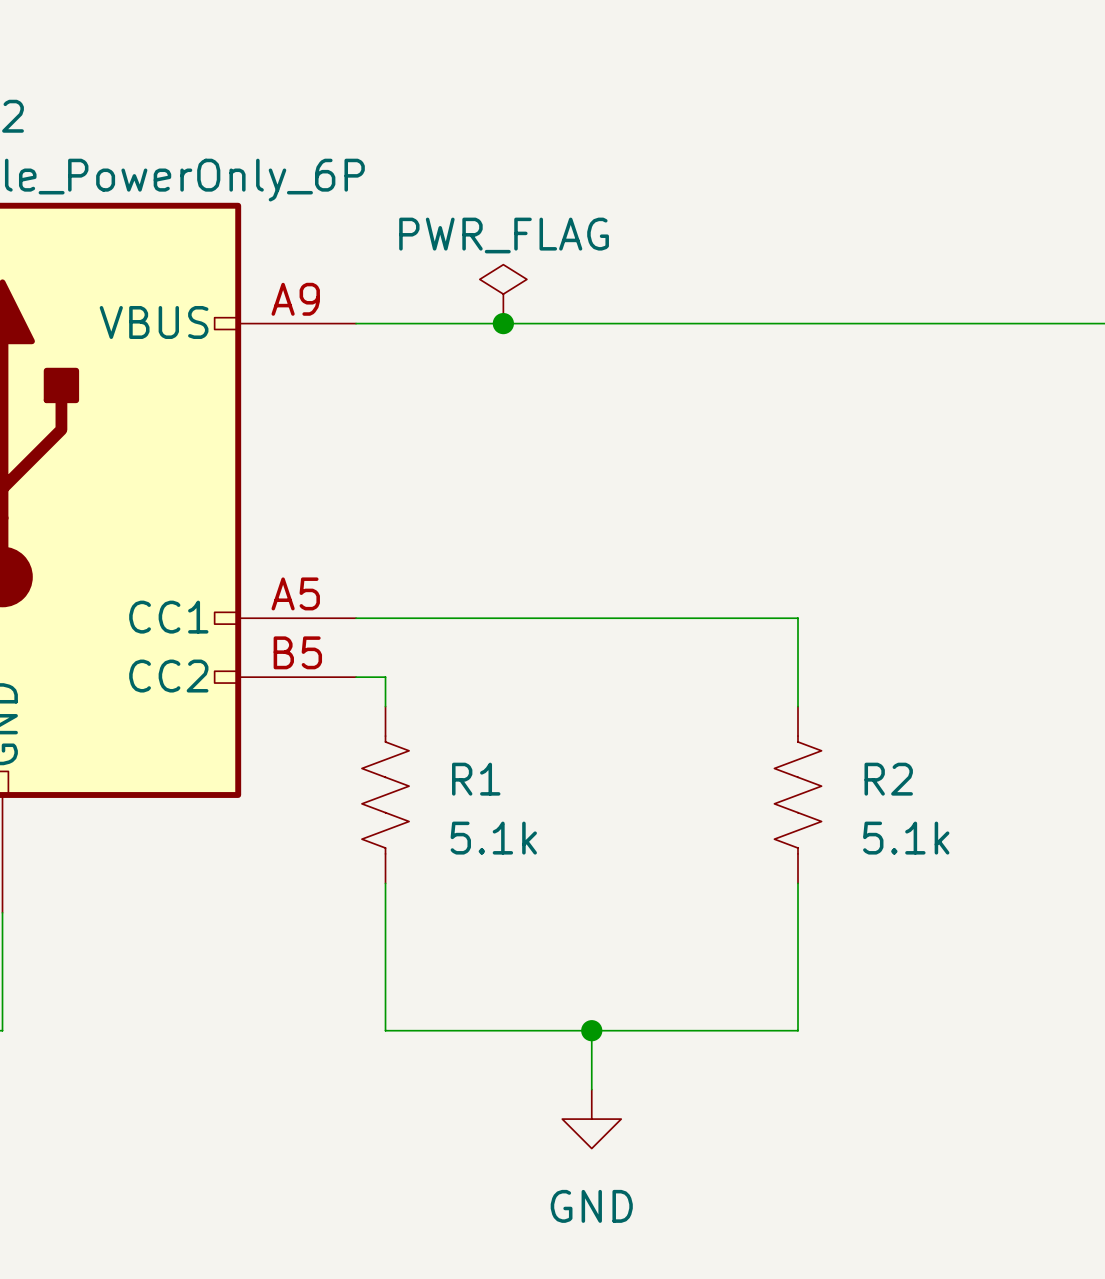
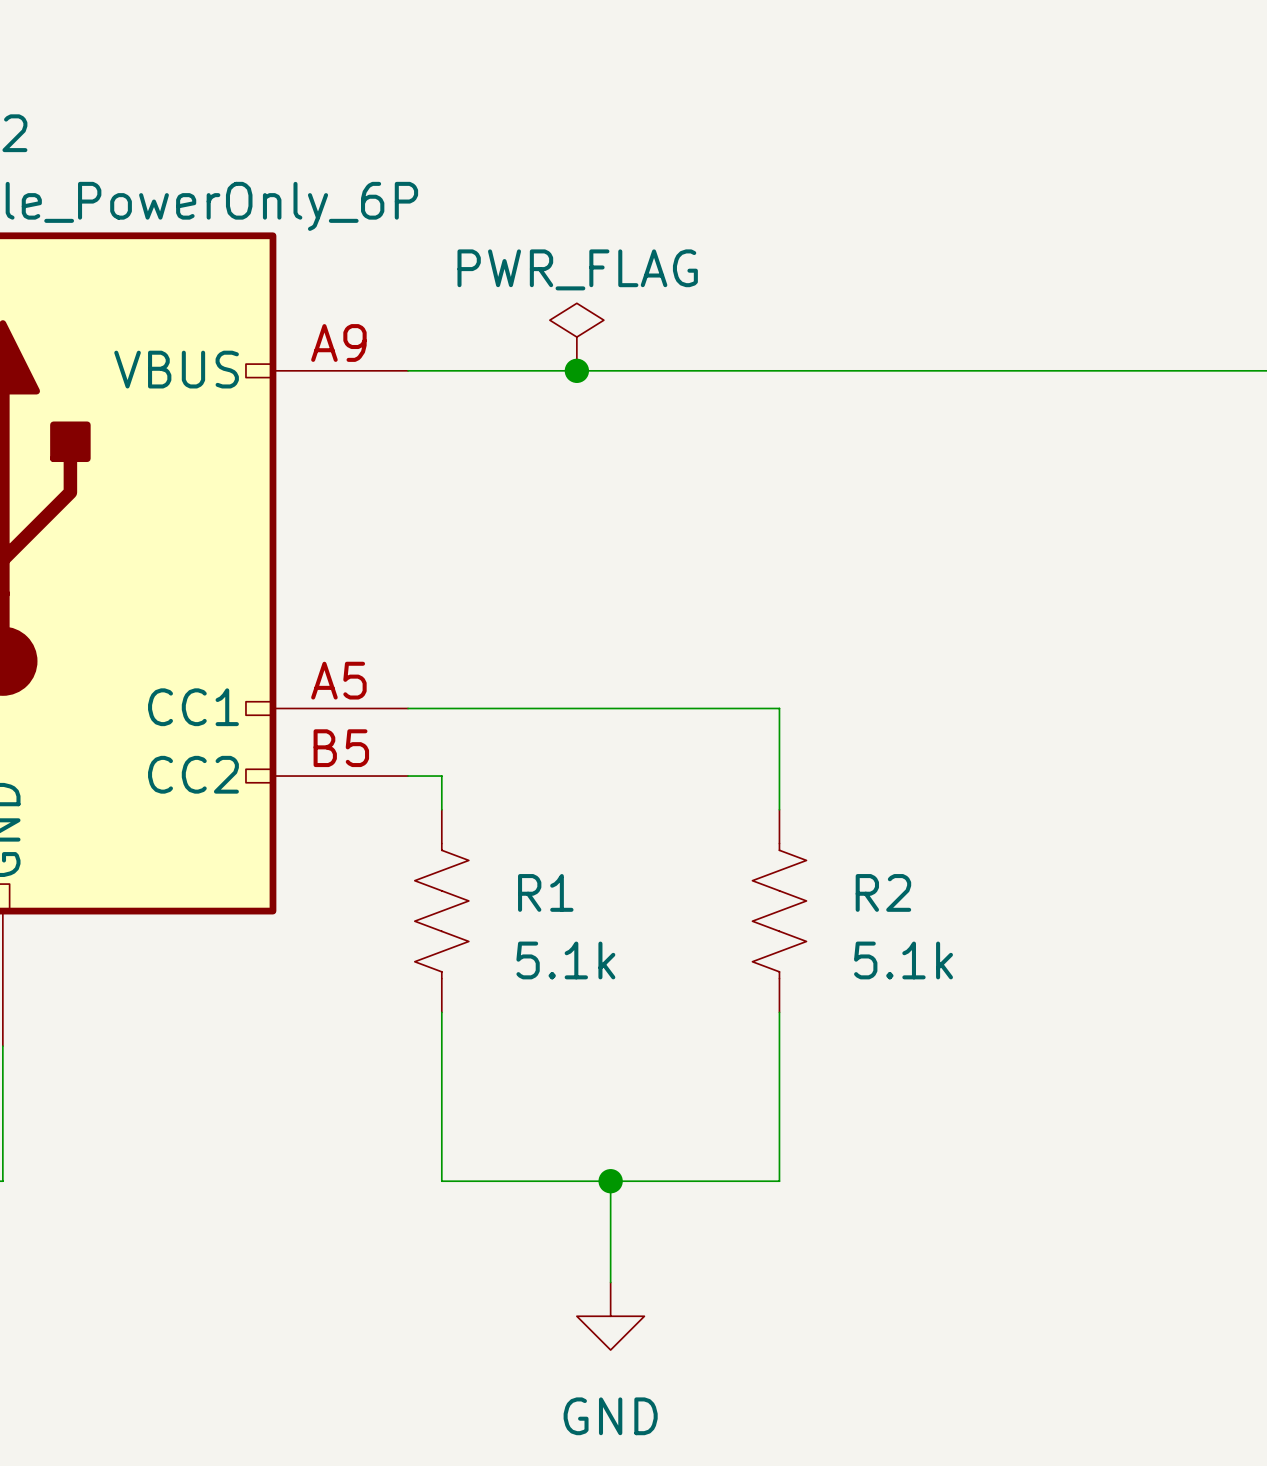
wire: (680, 618) (798, 618) (798, 706) -> (779, 708) (779, 809)
R2 position: (798, 794) -> (779, 911)
wire: (798, 883) (798, 1030) (680, 1030) -> (779, 1012) (779, 1181)
wire: none -> (610, 1181) (610, 1282)
wire: (591, 1030) (591, 1089) -> none
junction position: (591, 1030) -> (610, 1181)
power symbol position: GND (591, 1119) -> GND (610, 1316)

